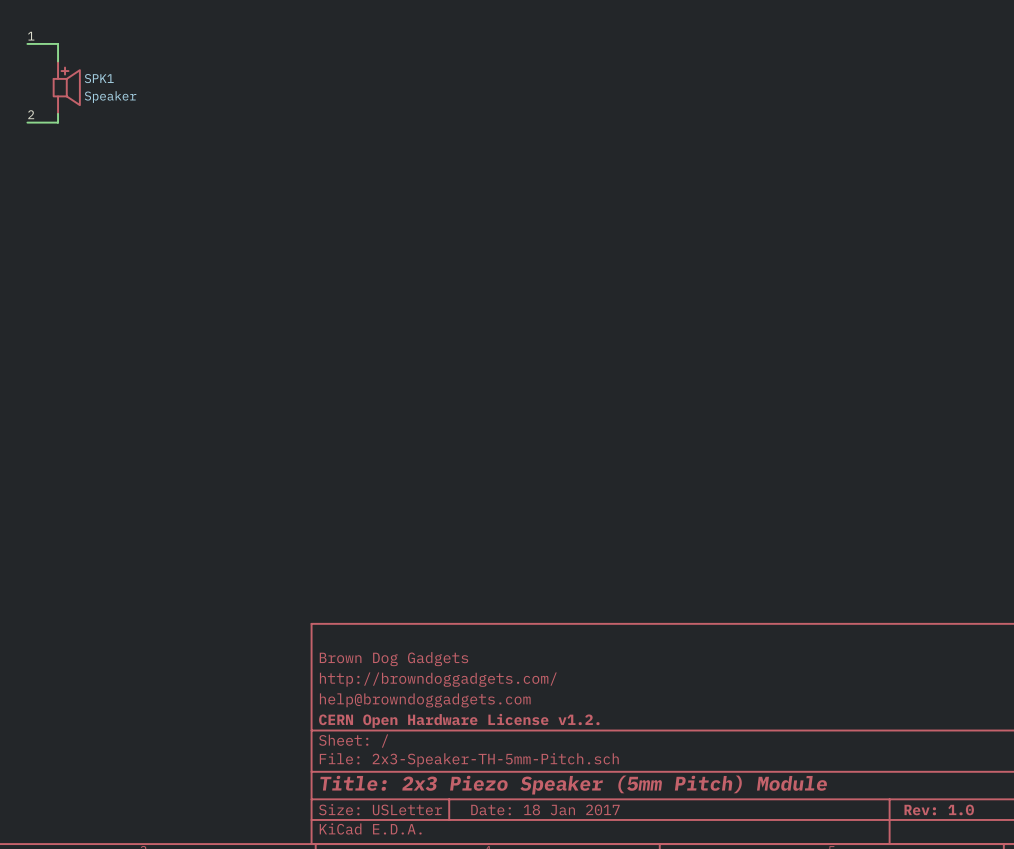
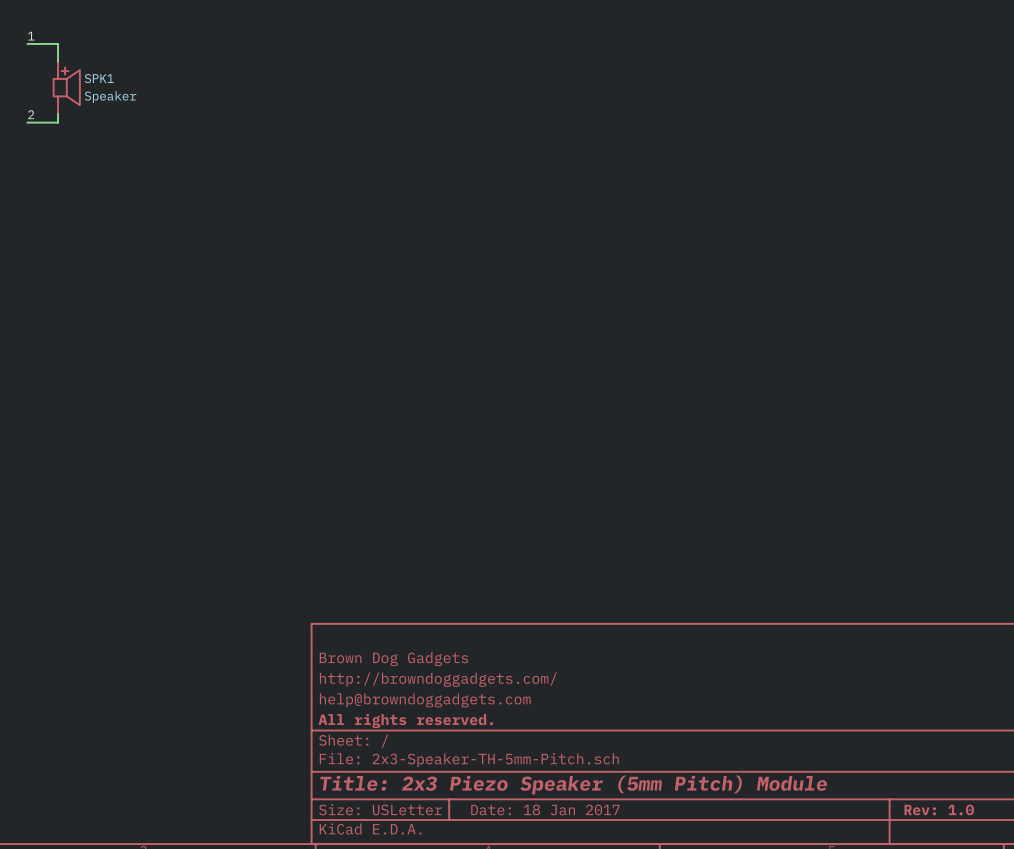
title block: CERN Open Hardware License v1.2. (459, 720) -> All rights reserved. (405, 720)

